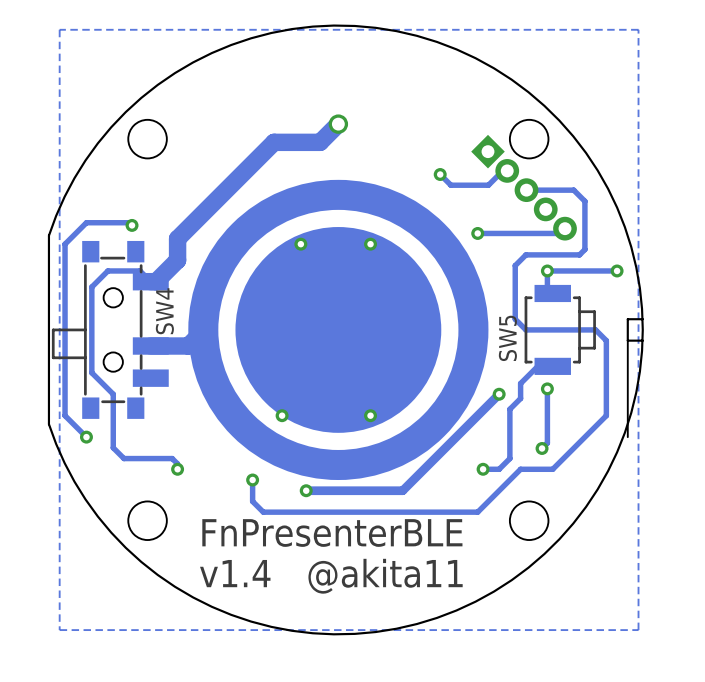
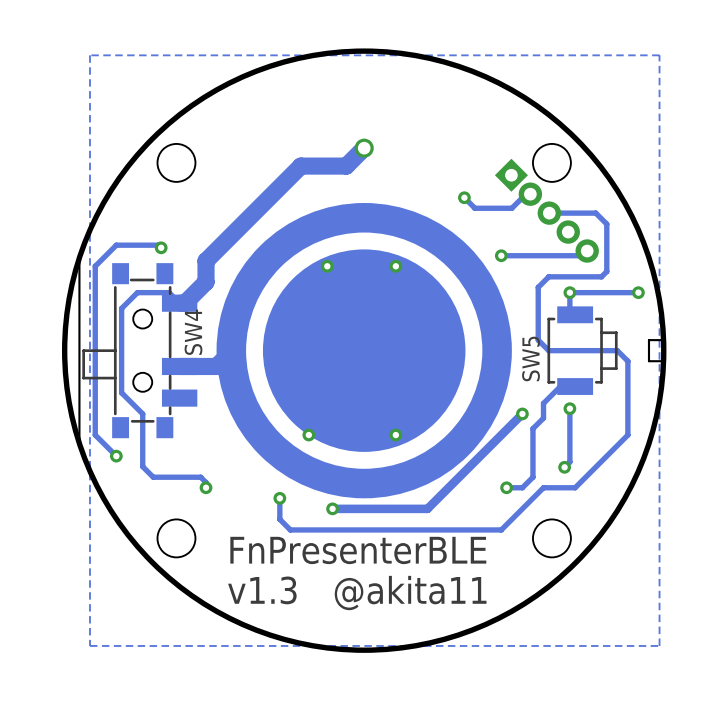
round board edge: none -> [61, 48, 667, 653]
board edge: (627, 340) (627, 437) -> none
text: v1.4 (235, 573) -> v1.3 (262, 590)

